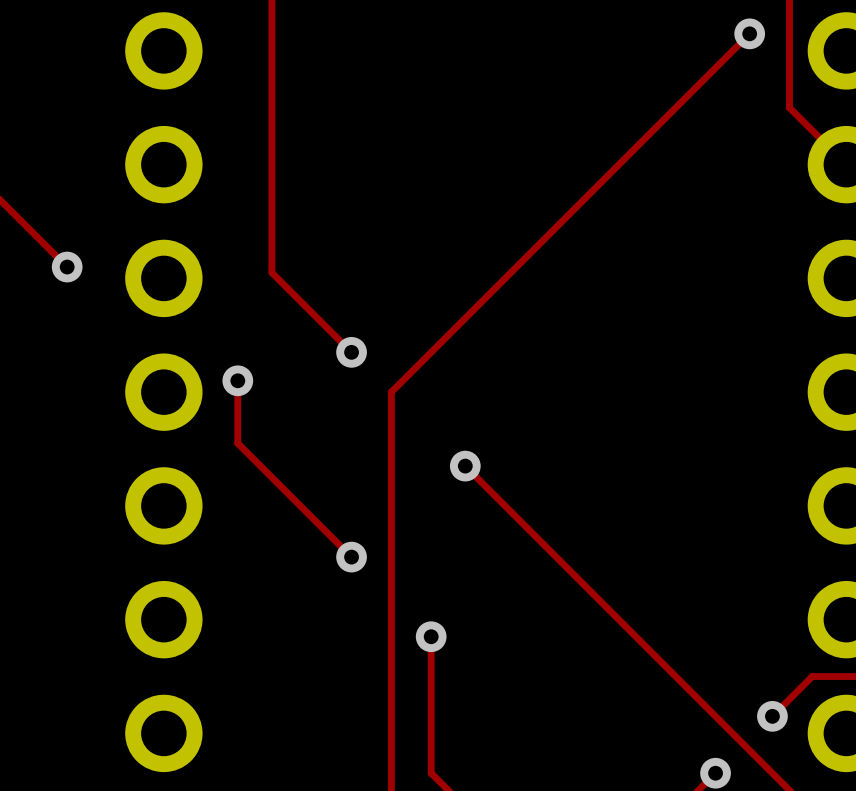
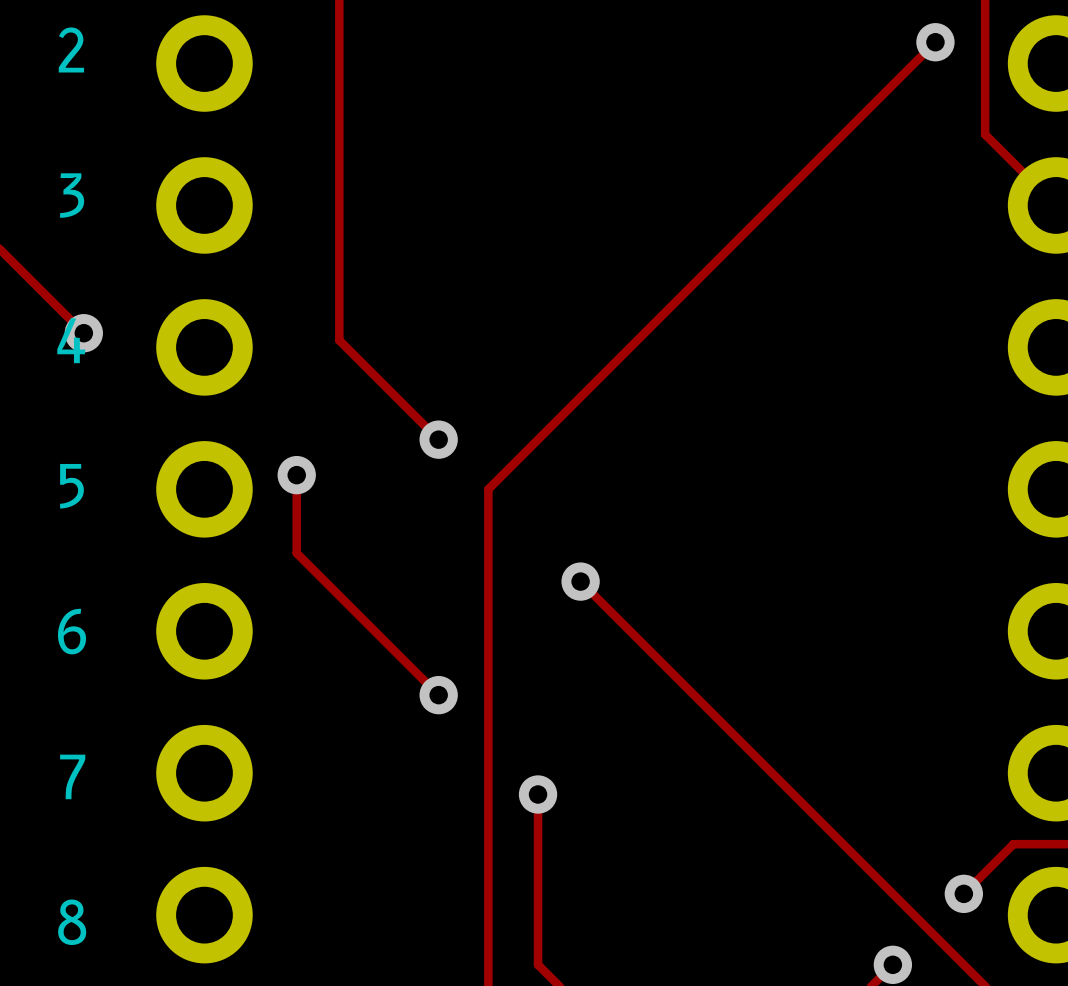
text: none -> 2 (71, 49)
text: none -> 3 (72, 195)
text: none -> 4 (71, 340)
text: none -> 5 (72, 486)
text: none -> 6 (72, 631)
text: none -> 7 (72, 776)
text: none -> 8 (72, 922)

